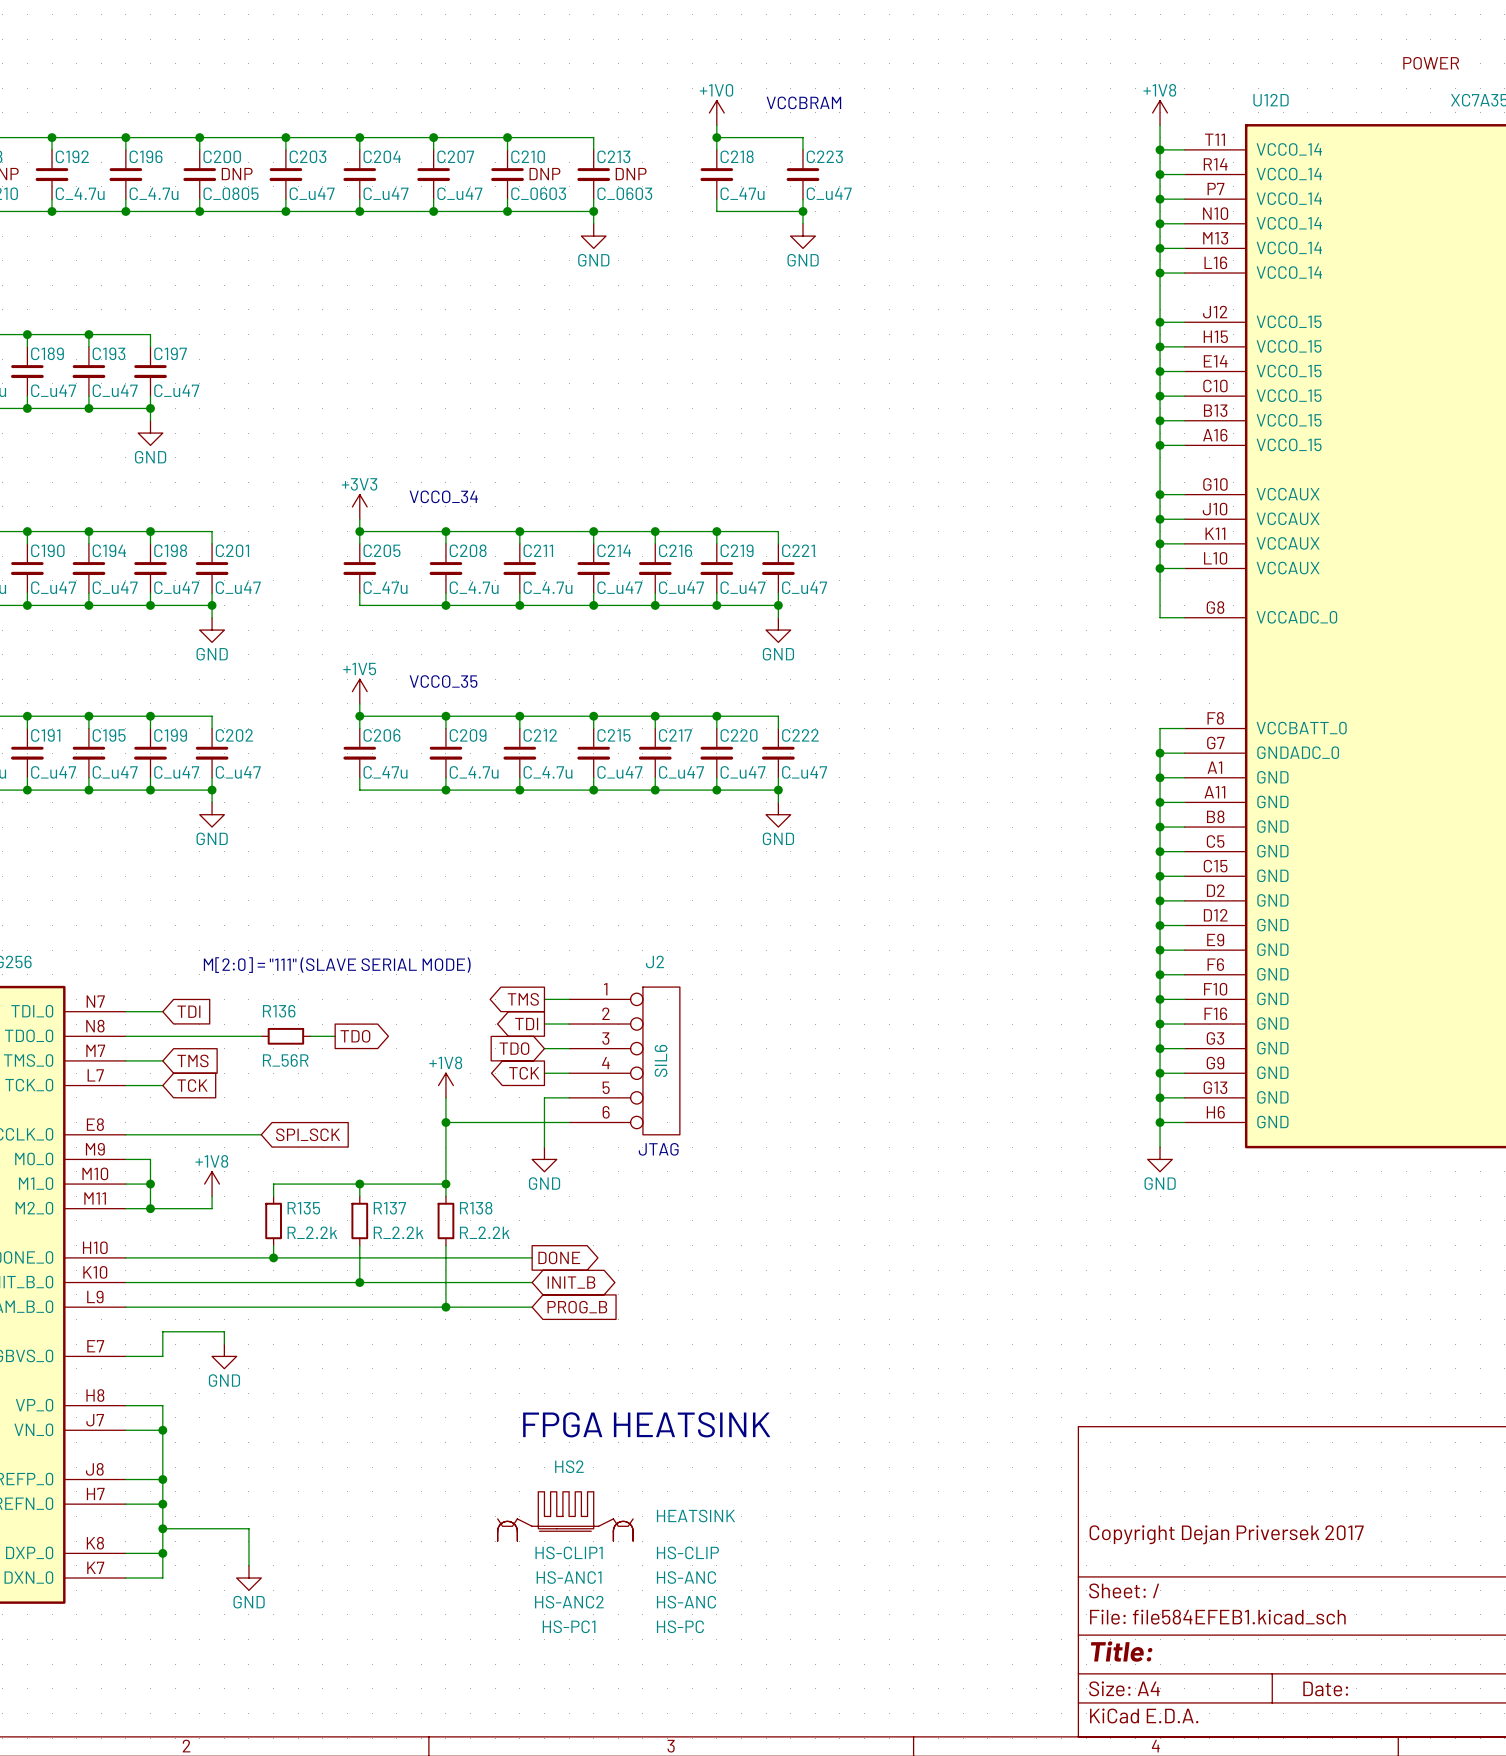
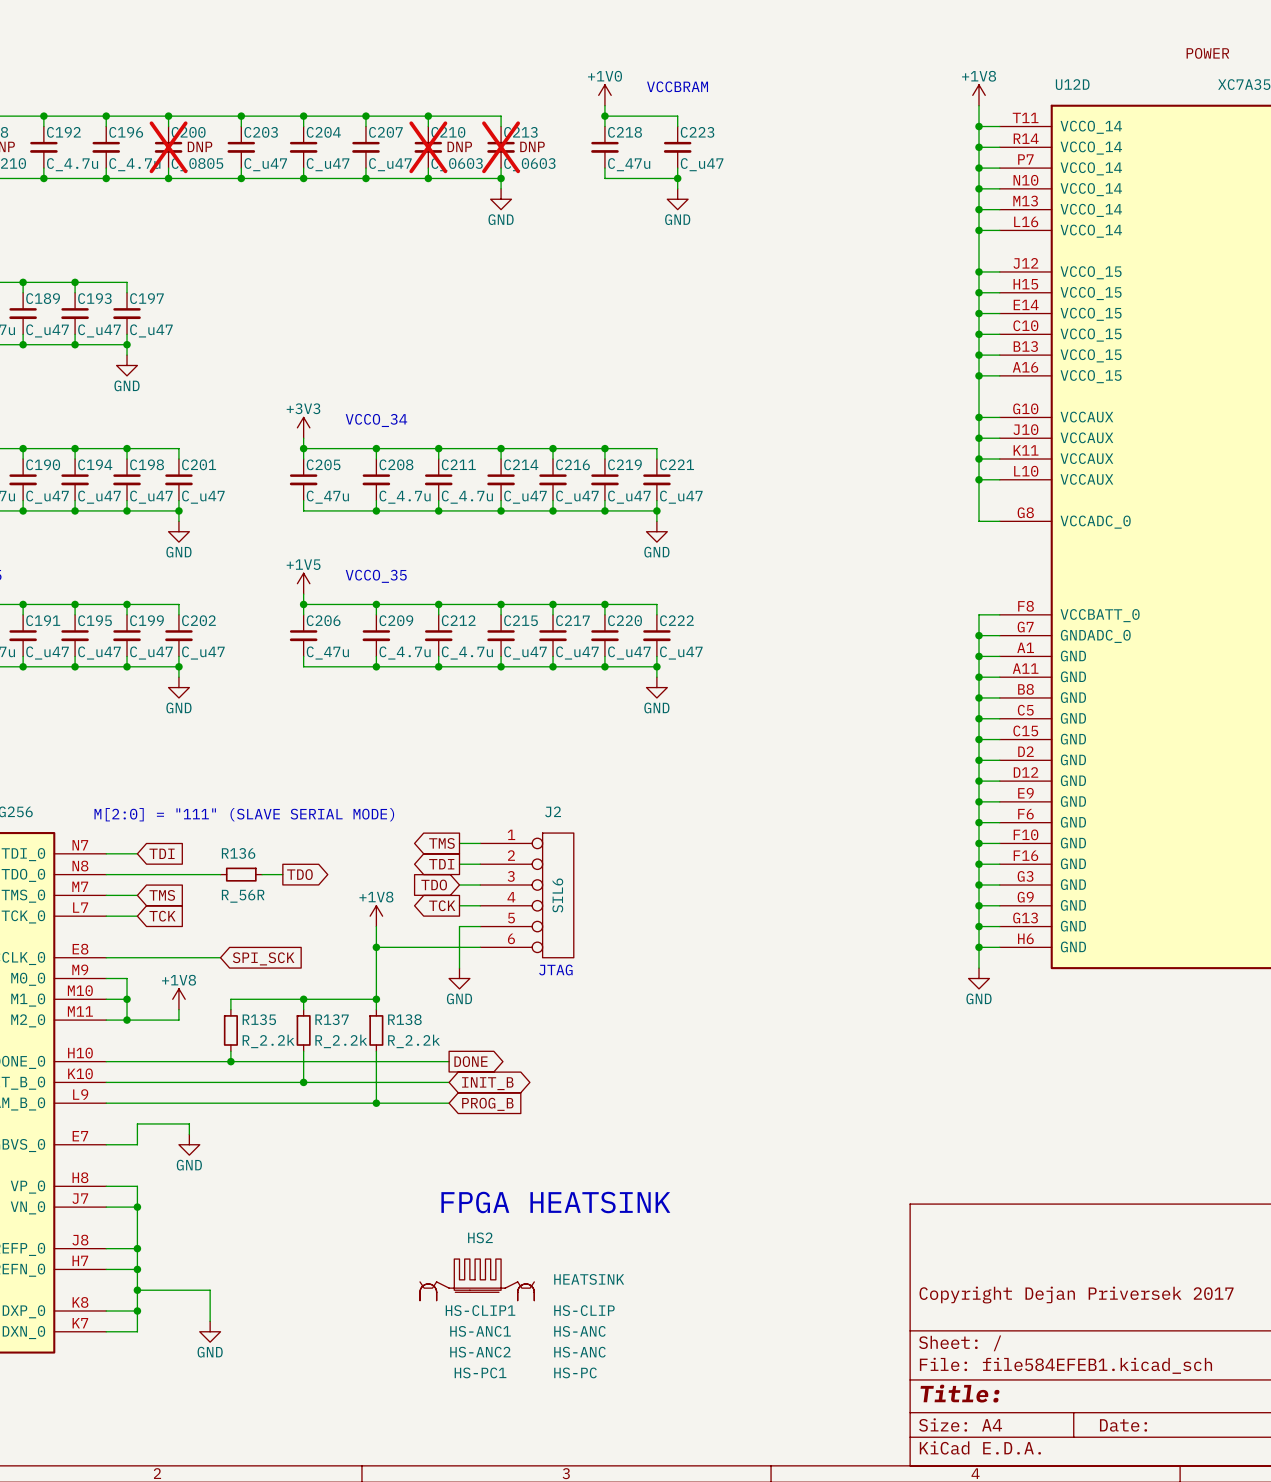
C200 do-not-place cross: none -> (168, 147)
C210 do-not-place cross: none -> (428, 147)
C213 do-not-place cross: none -> (501, 147)

